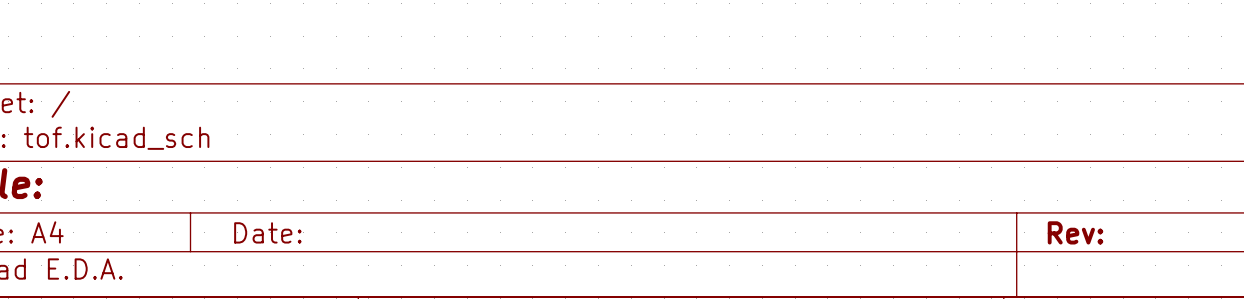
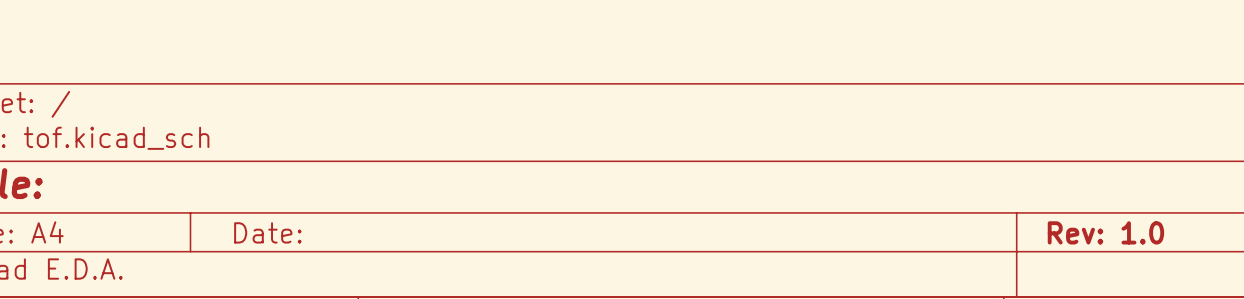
title block: Rev: (1075, 232) -> Rev: 1.0 (1105, 232)

